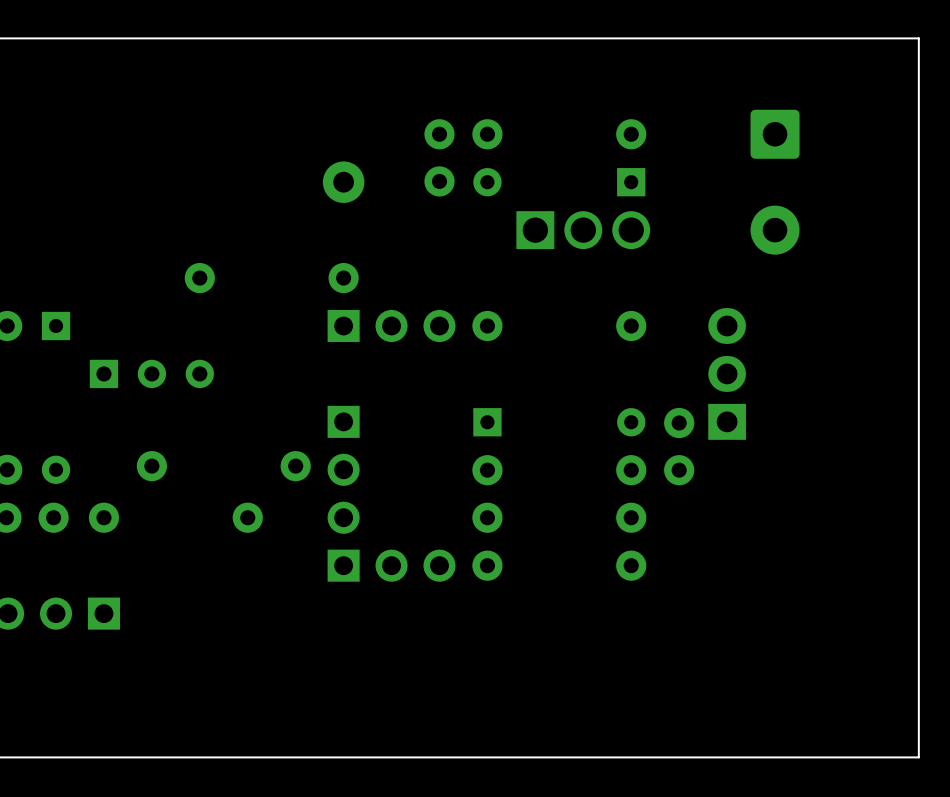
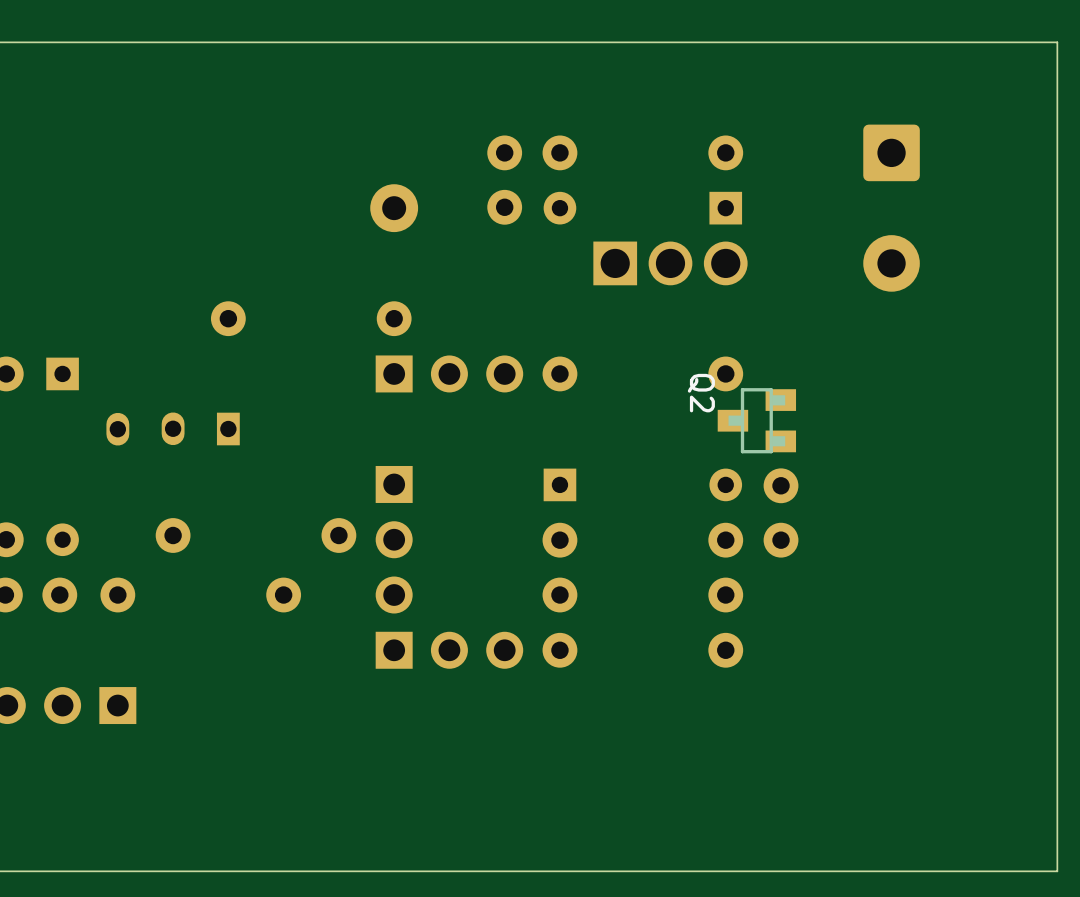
part footprint: [89, 359, 214, 389] -> [106, 412, 240, 446]
Q2: none -> (756, 420)
part: (727, 373) -> none

